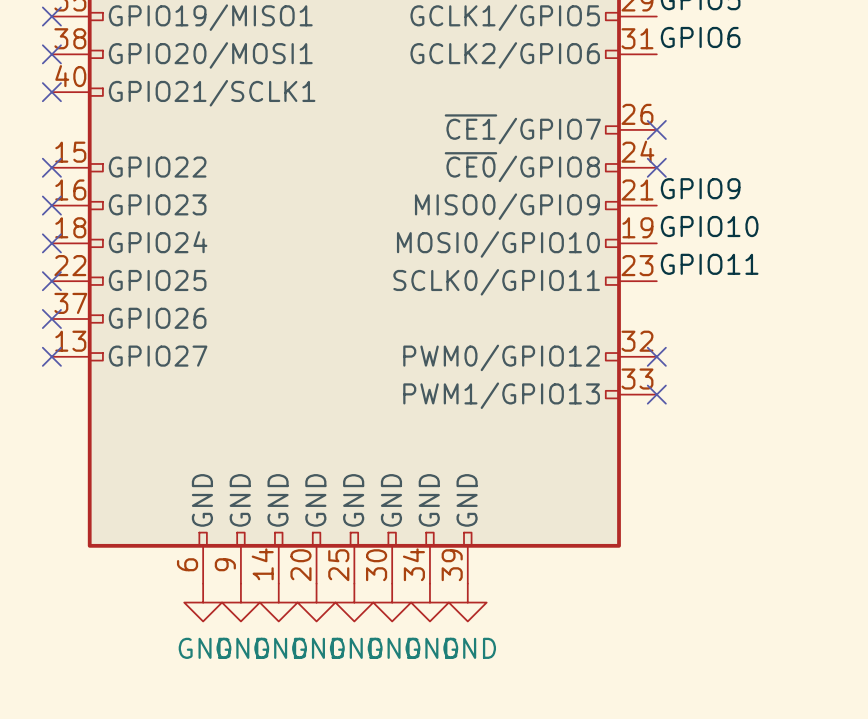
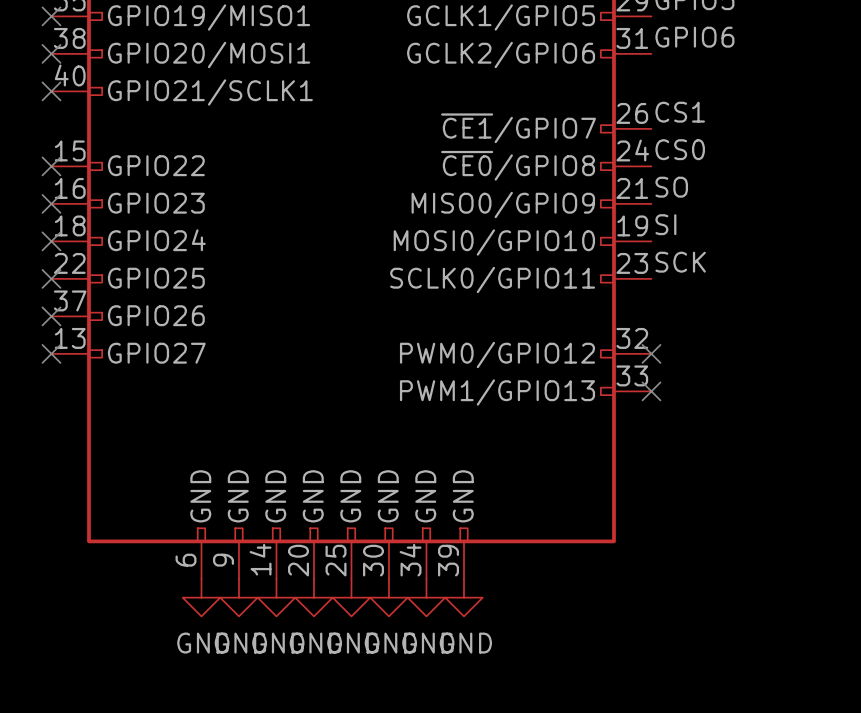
label: none -> CS1 (680, 112)
no-connect mark: (656, 129) -> none
label: none -> CS0 (680, 149)
no-connect mark: (656, 167) -> none
label: GPIO9 (700, 188) -> SO (671, 187)
label: GPIO10 (709, 226) -> SI (665, 224)
label: GPIO11 (709, 264) -> SCK (680, 262)

